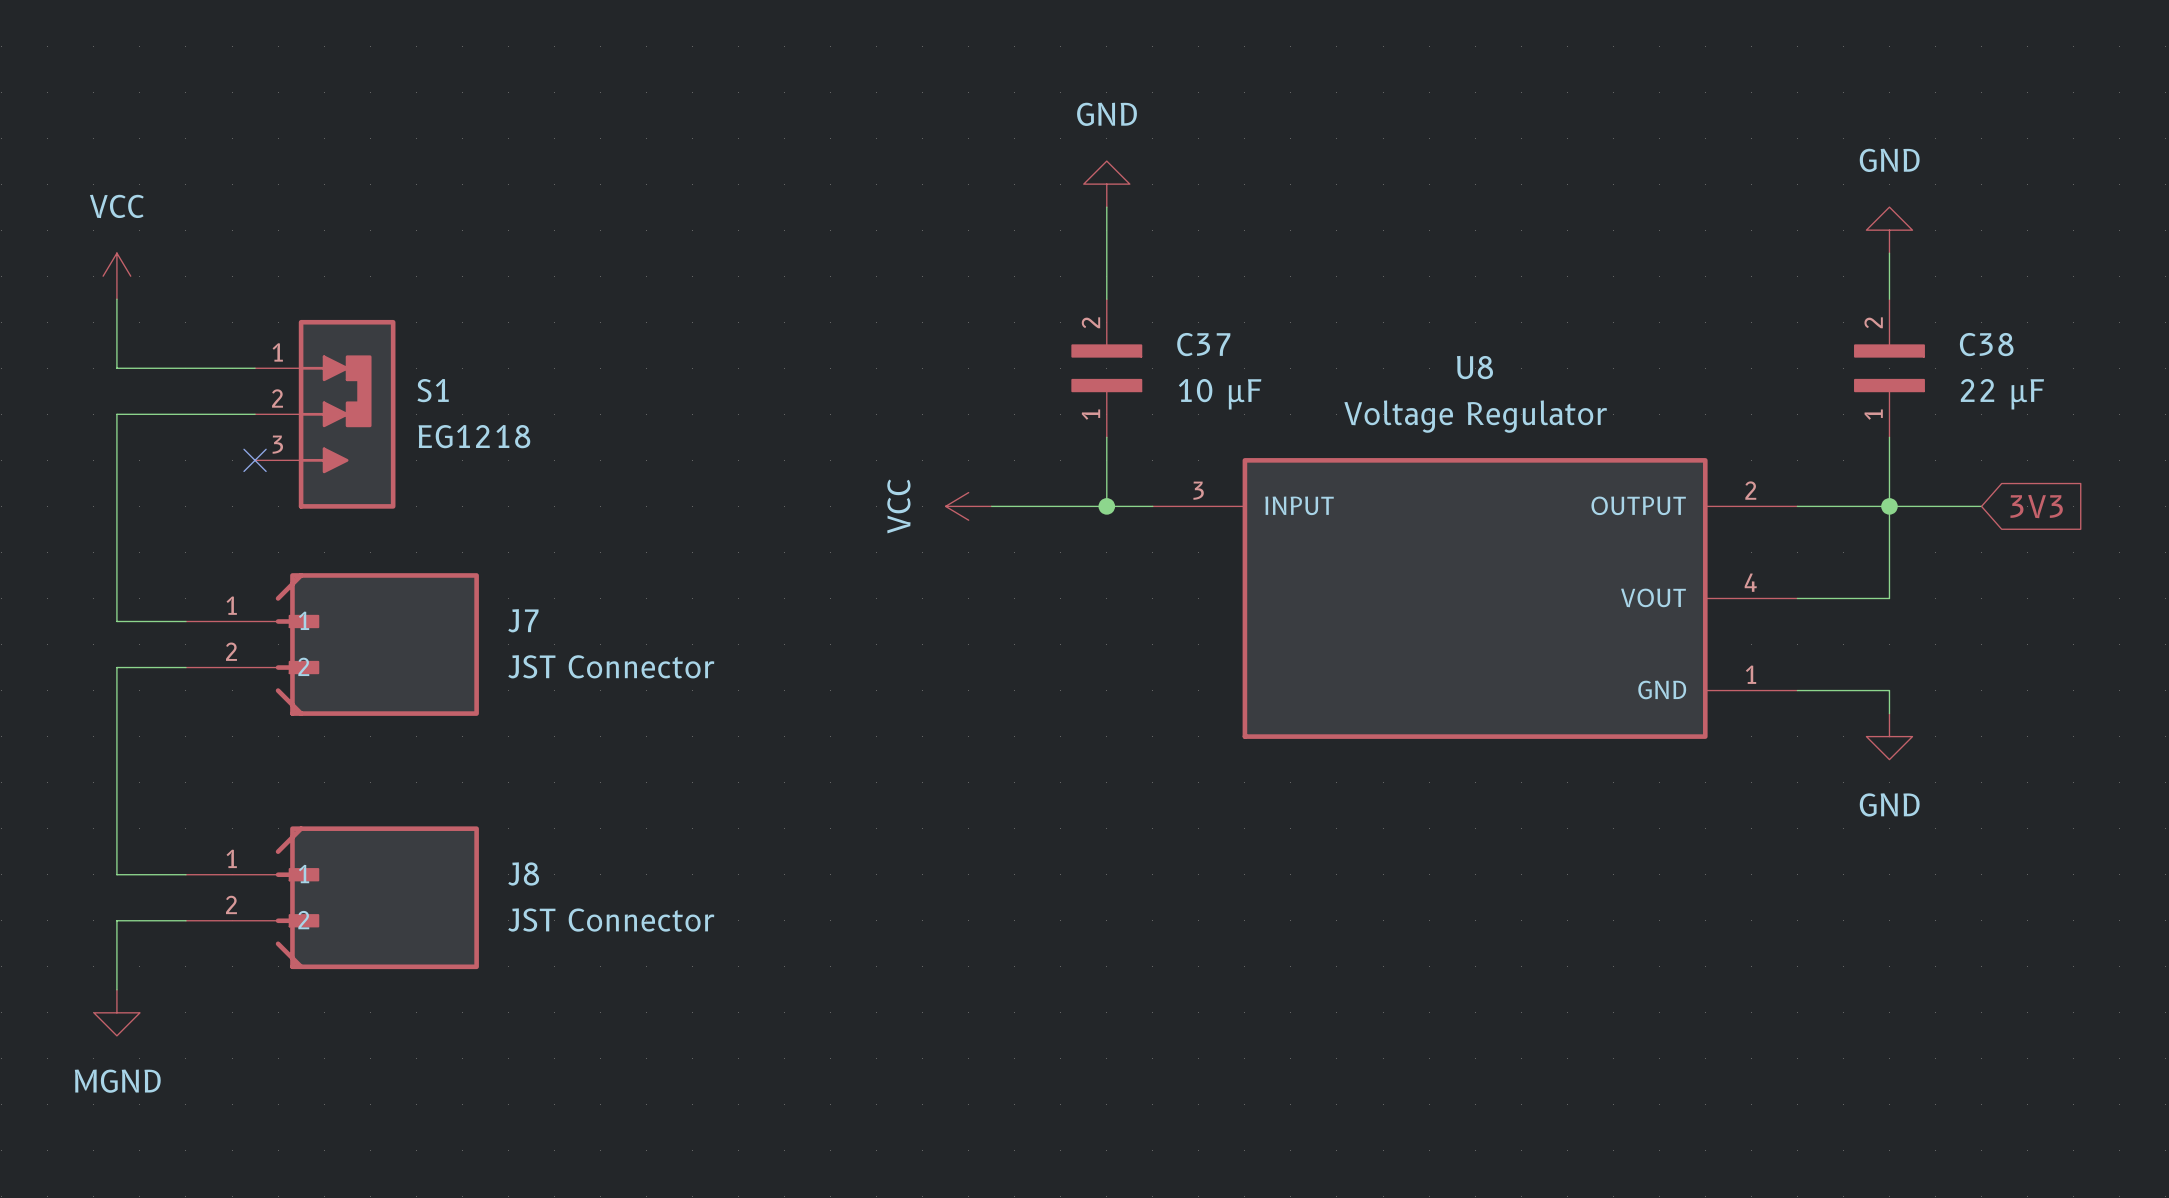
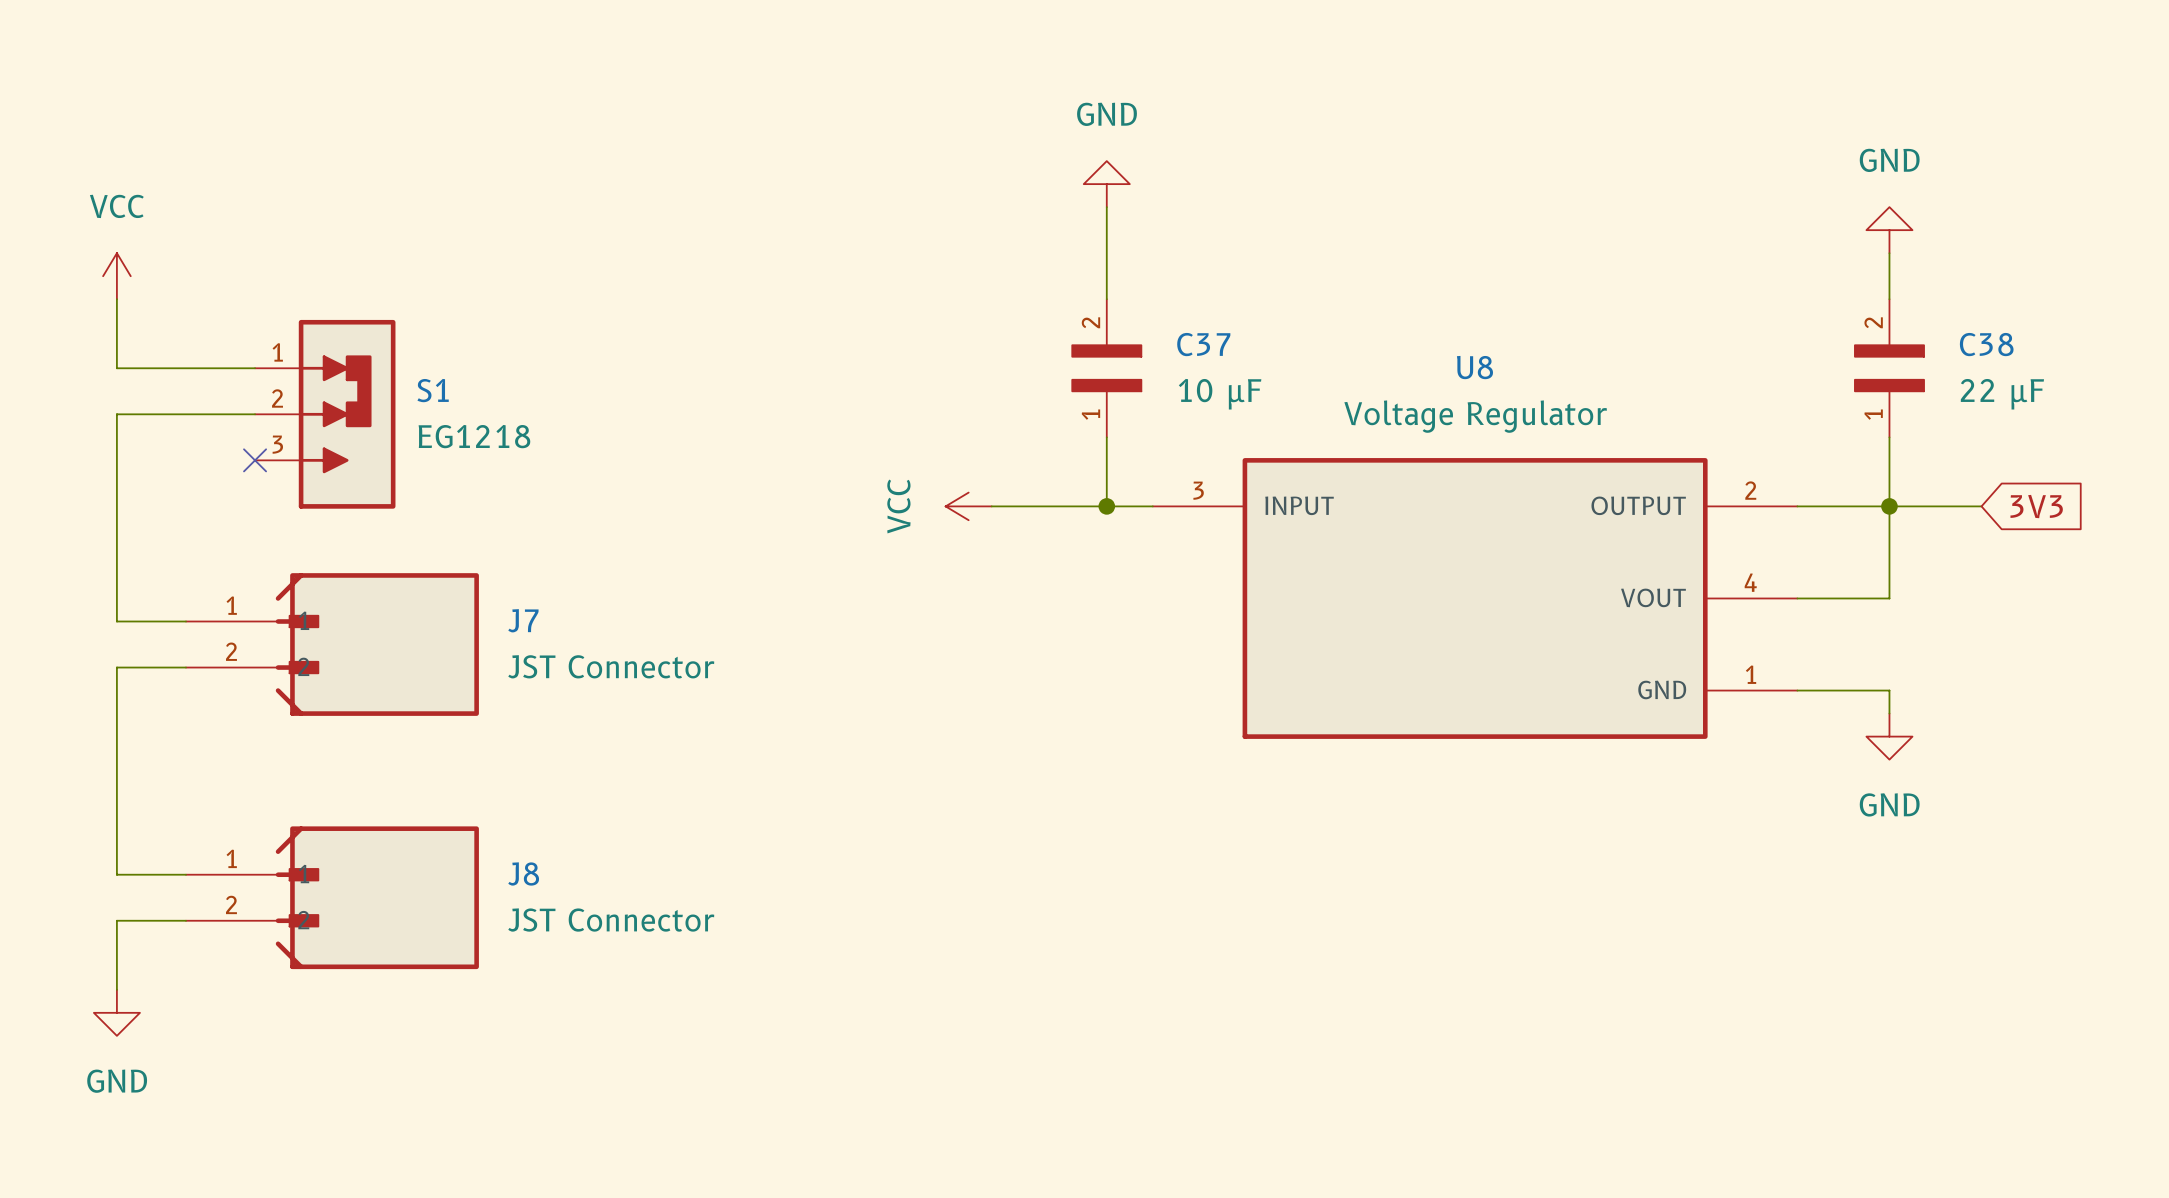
power symbol: MGND (116, 1012) -> GND (116, 1012)

